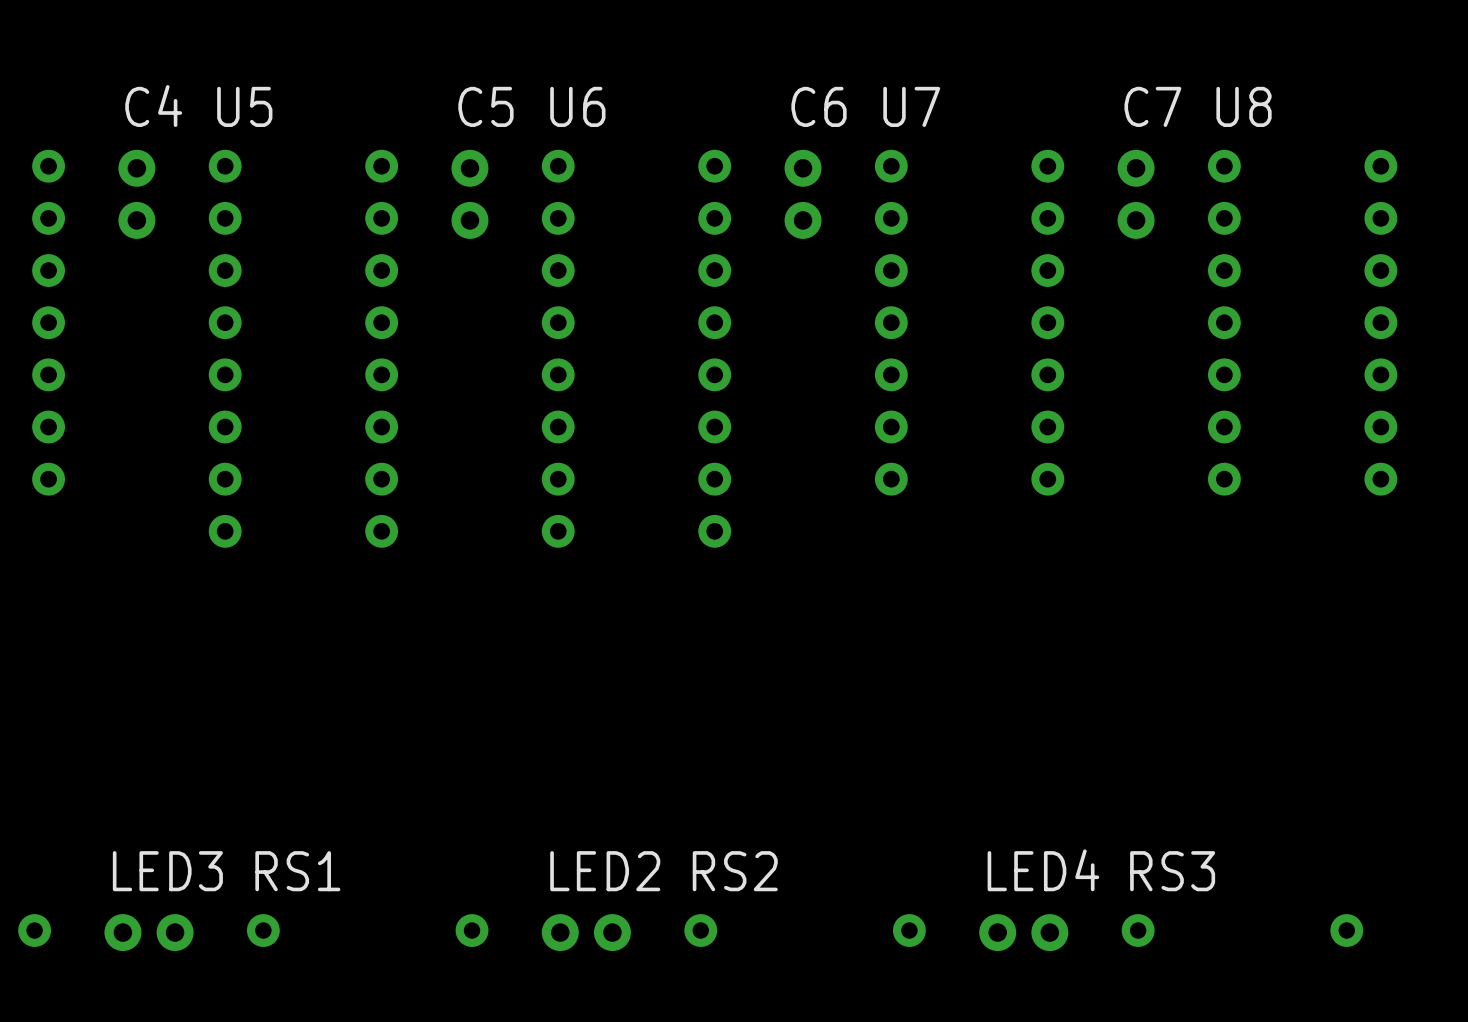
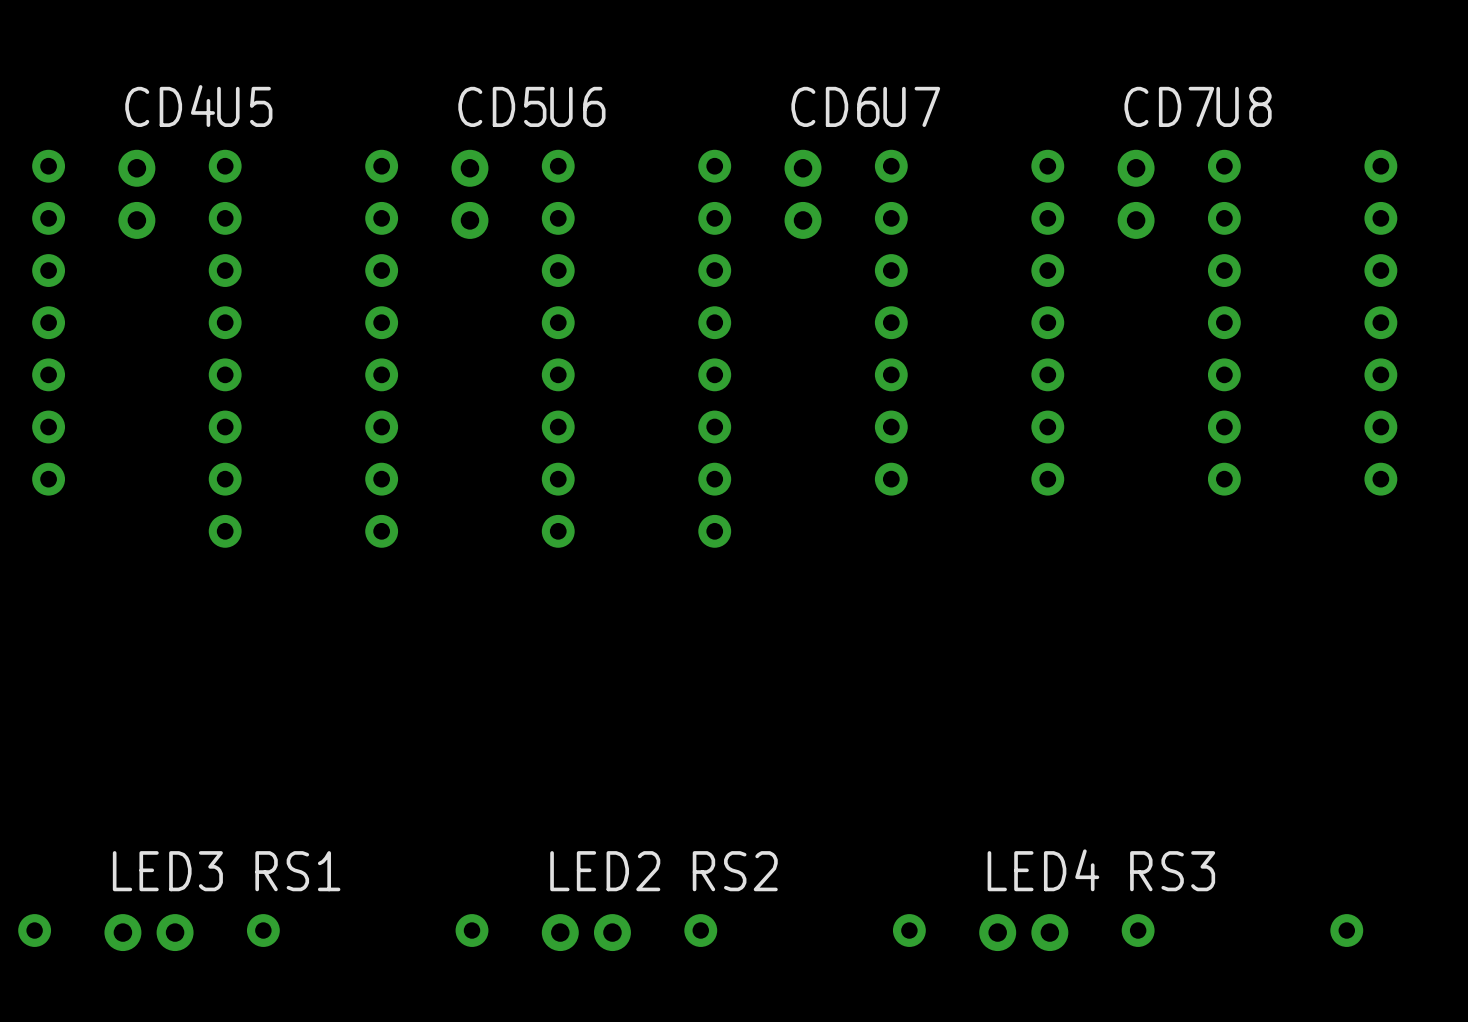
C4 name: C4 (153, 106) -> CD4 (170, 106)
C5 name: C5 (485, 106) -> CD5 (502, 106)
C6 name: C6 (819, 106) -> CD6 (835, 106)
C7 name: C7 (1152, 106) -> CD7 (1169, 106)

